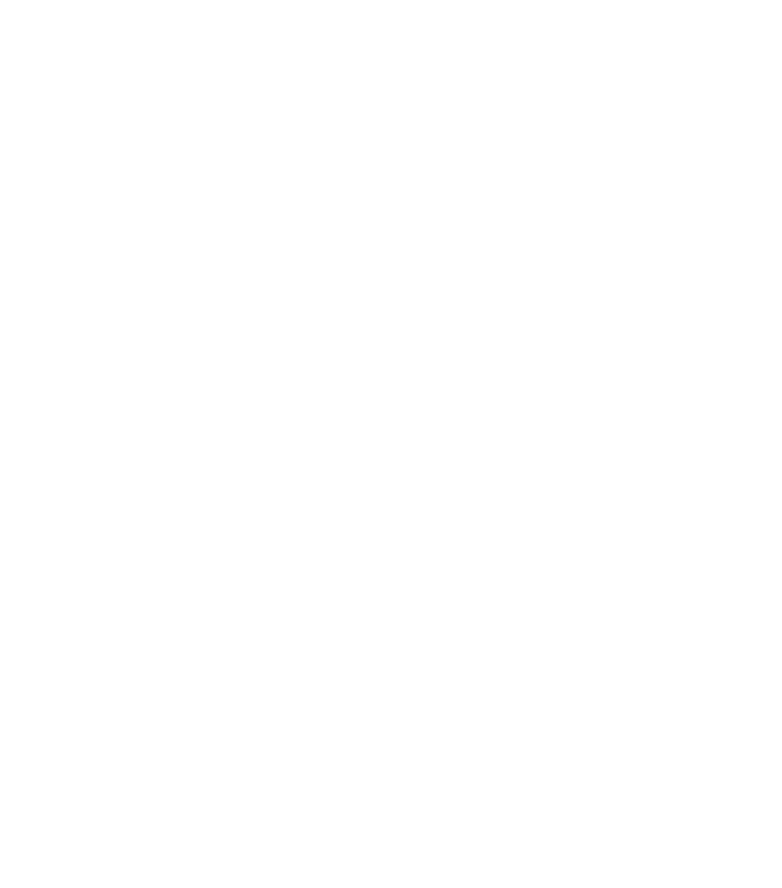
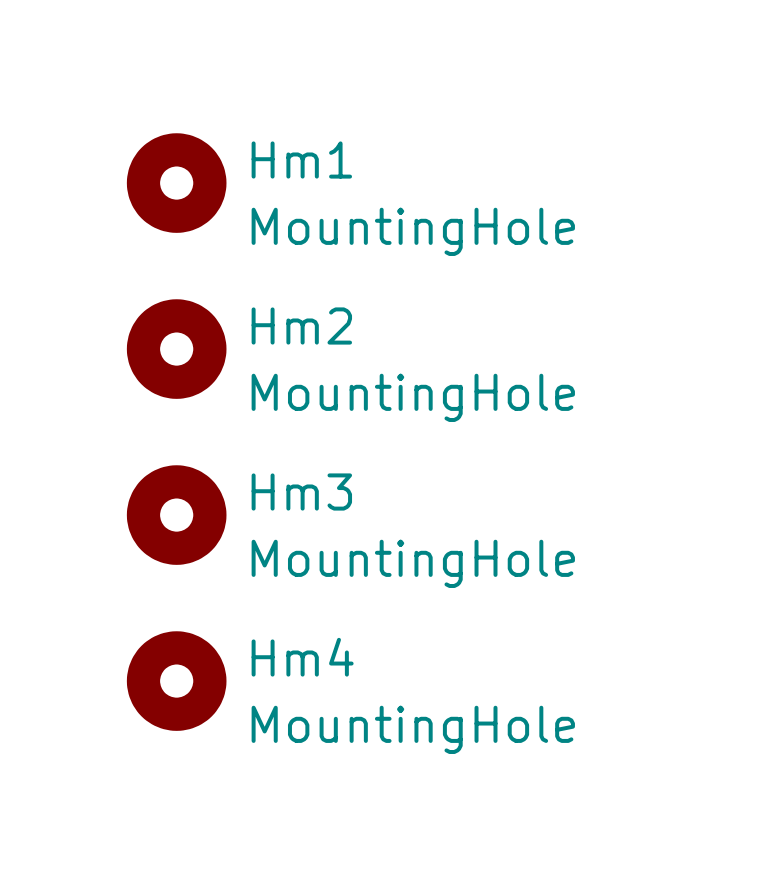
Hm1: none -> MountingHole (176, 183)
Hm2: none -> MountingHole (176, 349)
Hm3: none -> MountingHole (176, 515)
Hm4: none -> MountingHole (176, 681)

